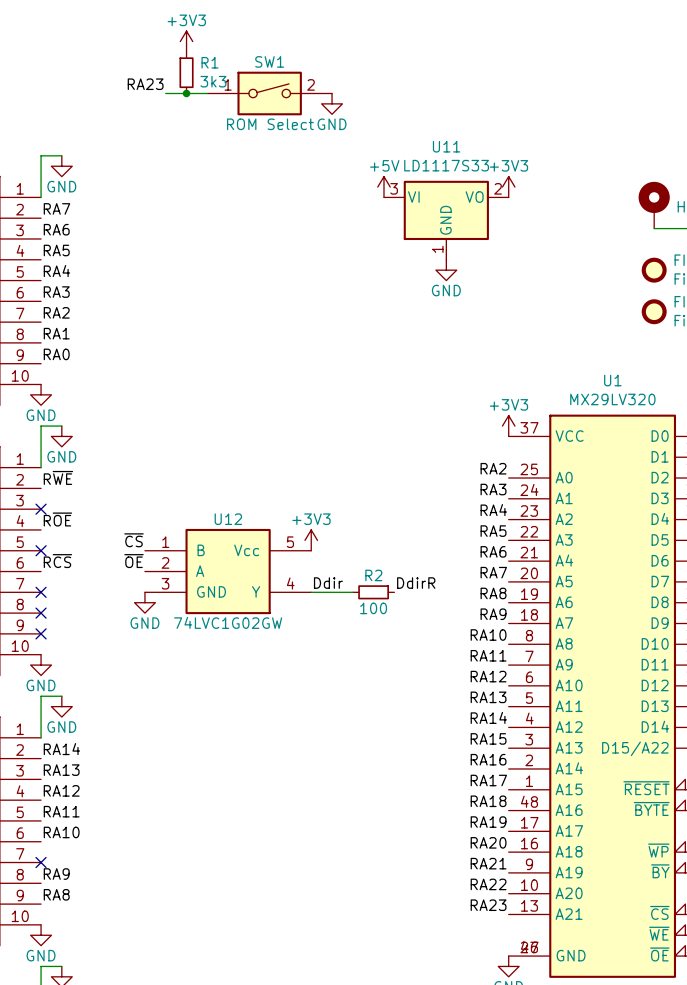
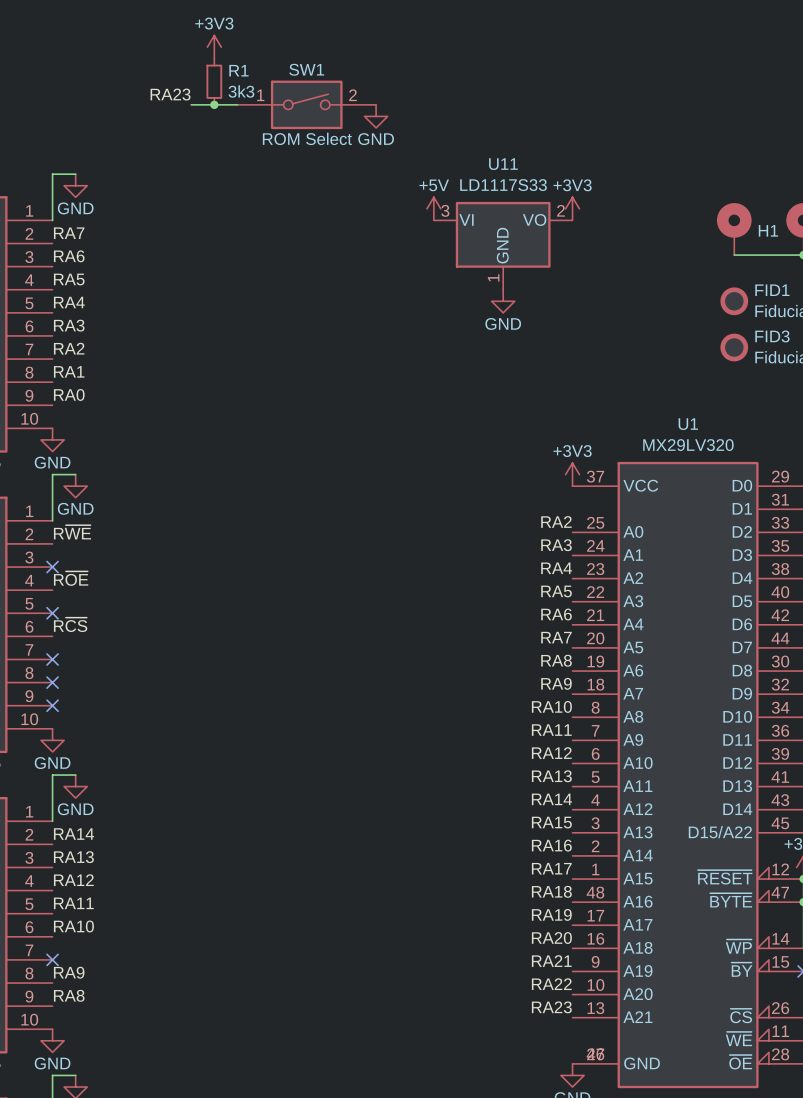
label: ~{CS} (134, 540) -> none
power symbol: +3V3 (311, 540) -> none
label: ~{OE} (134, 561) -> none
U12: 74LVC1G02GW (228, 571) -> none
label: Ddir (328, 583) -> none
label: DdirR (416, 583) -> none
wire: (311, 592) (352, 592) -> none
R2: 100 (373, 592) -> none
power symbol: GND (144, 602) -> none

